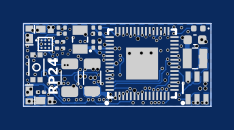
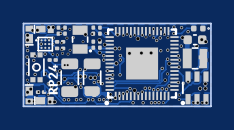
via: (80, 41) -> none
via: none -> (83, 41)
via: (85, 41) -> none
via: (53, 52) -> none
via: none -> (52, 54)
via: (52, 56) -> none
via: (78, 56) -> none
via: (80, 59) -> none
via: (93, 69) -> none
via: (97, 69) -> none
track: none -> (80, 76) (68, 78) (63, 82)
via: (63, 83) -> none
via: none -> (71, 83)
via: (78, 83) -> none
via: none -> (80, 83)
via: (73, 86) -> none
via: none -> (75, 86)

